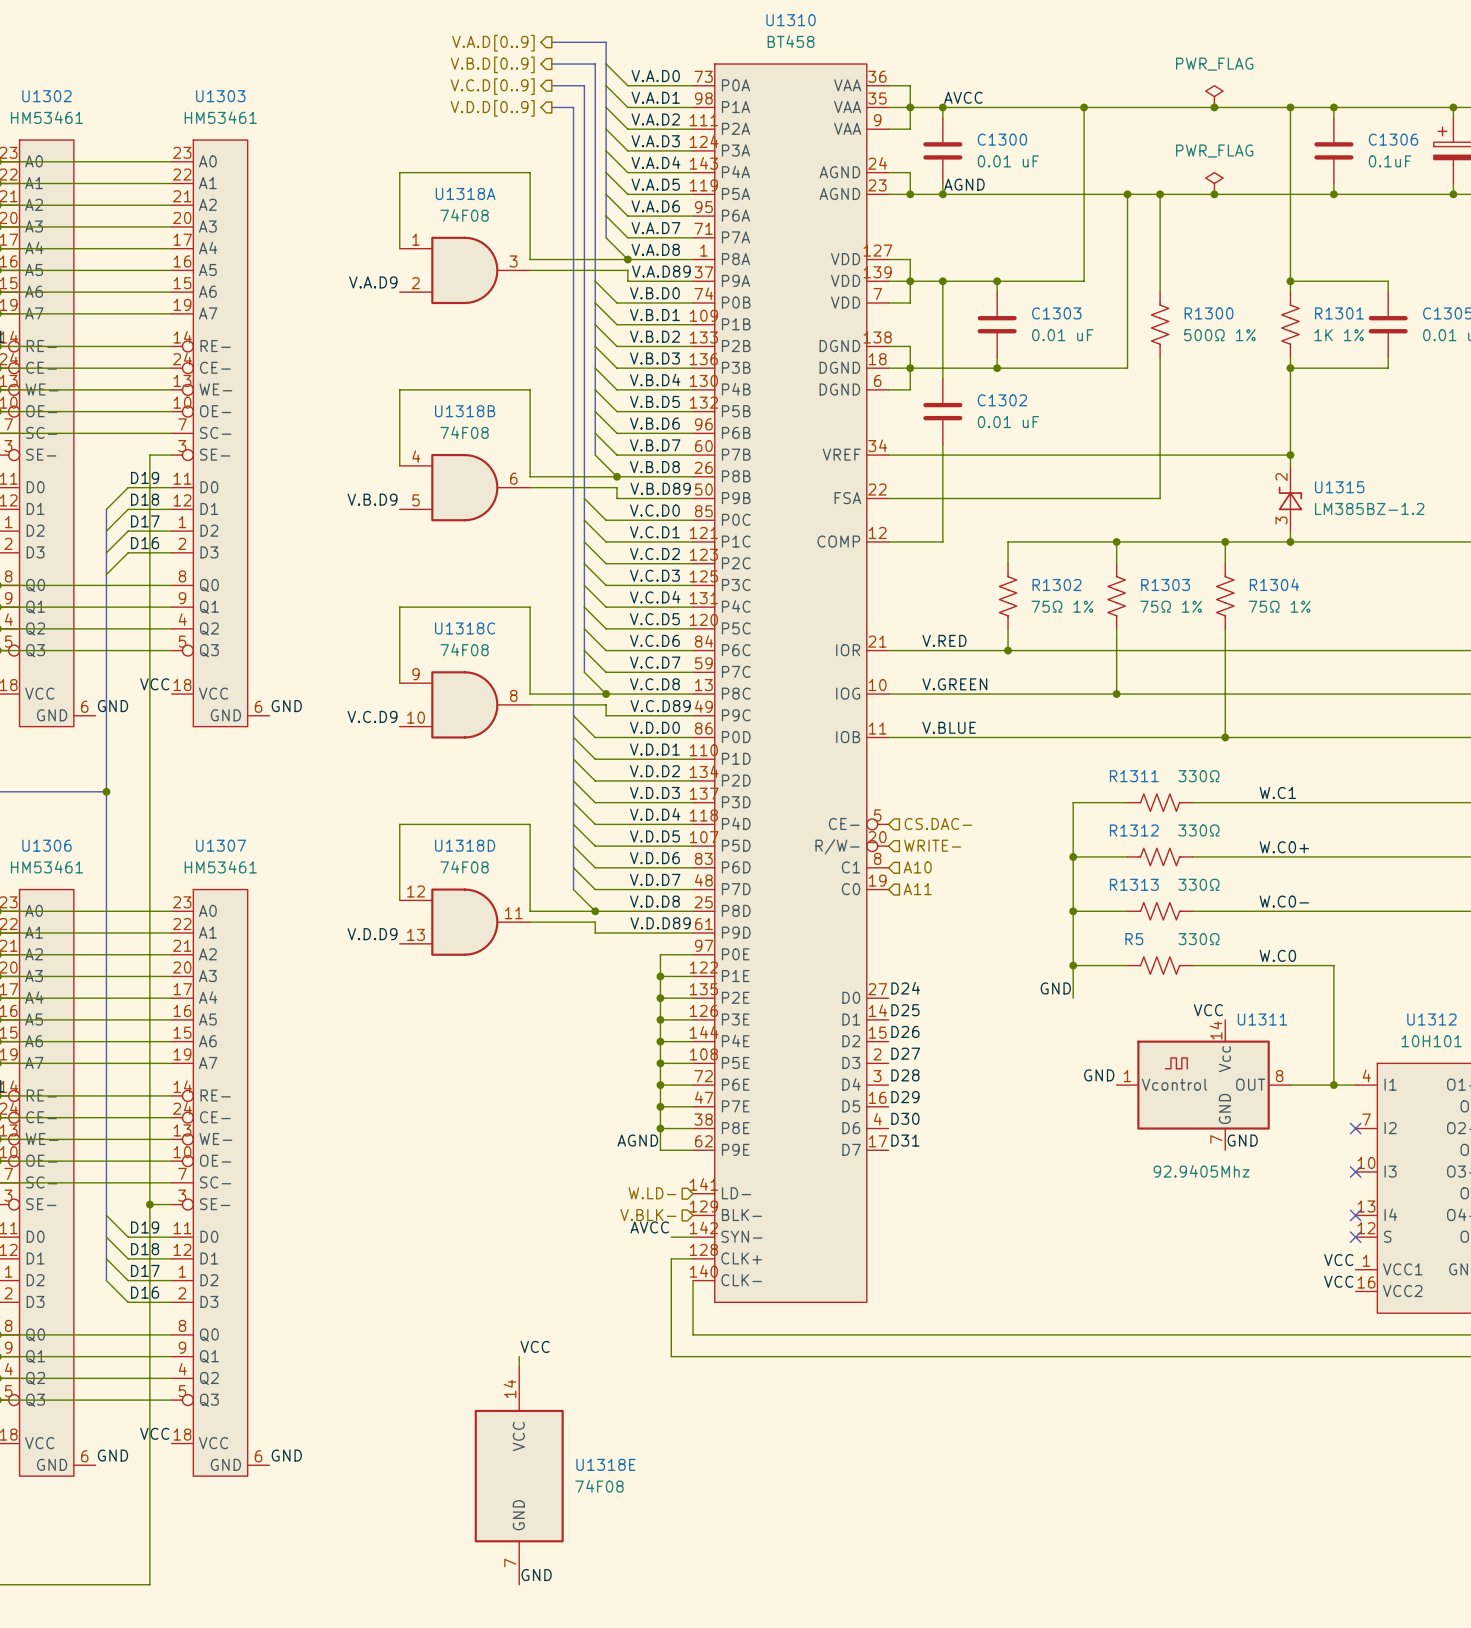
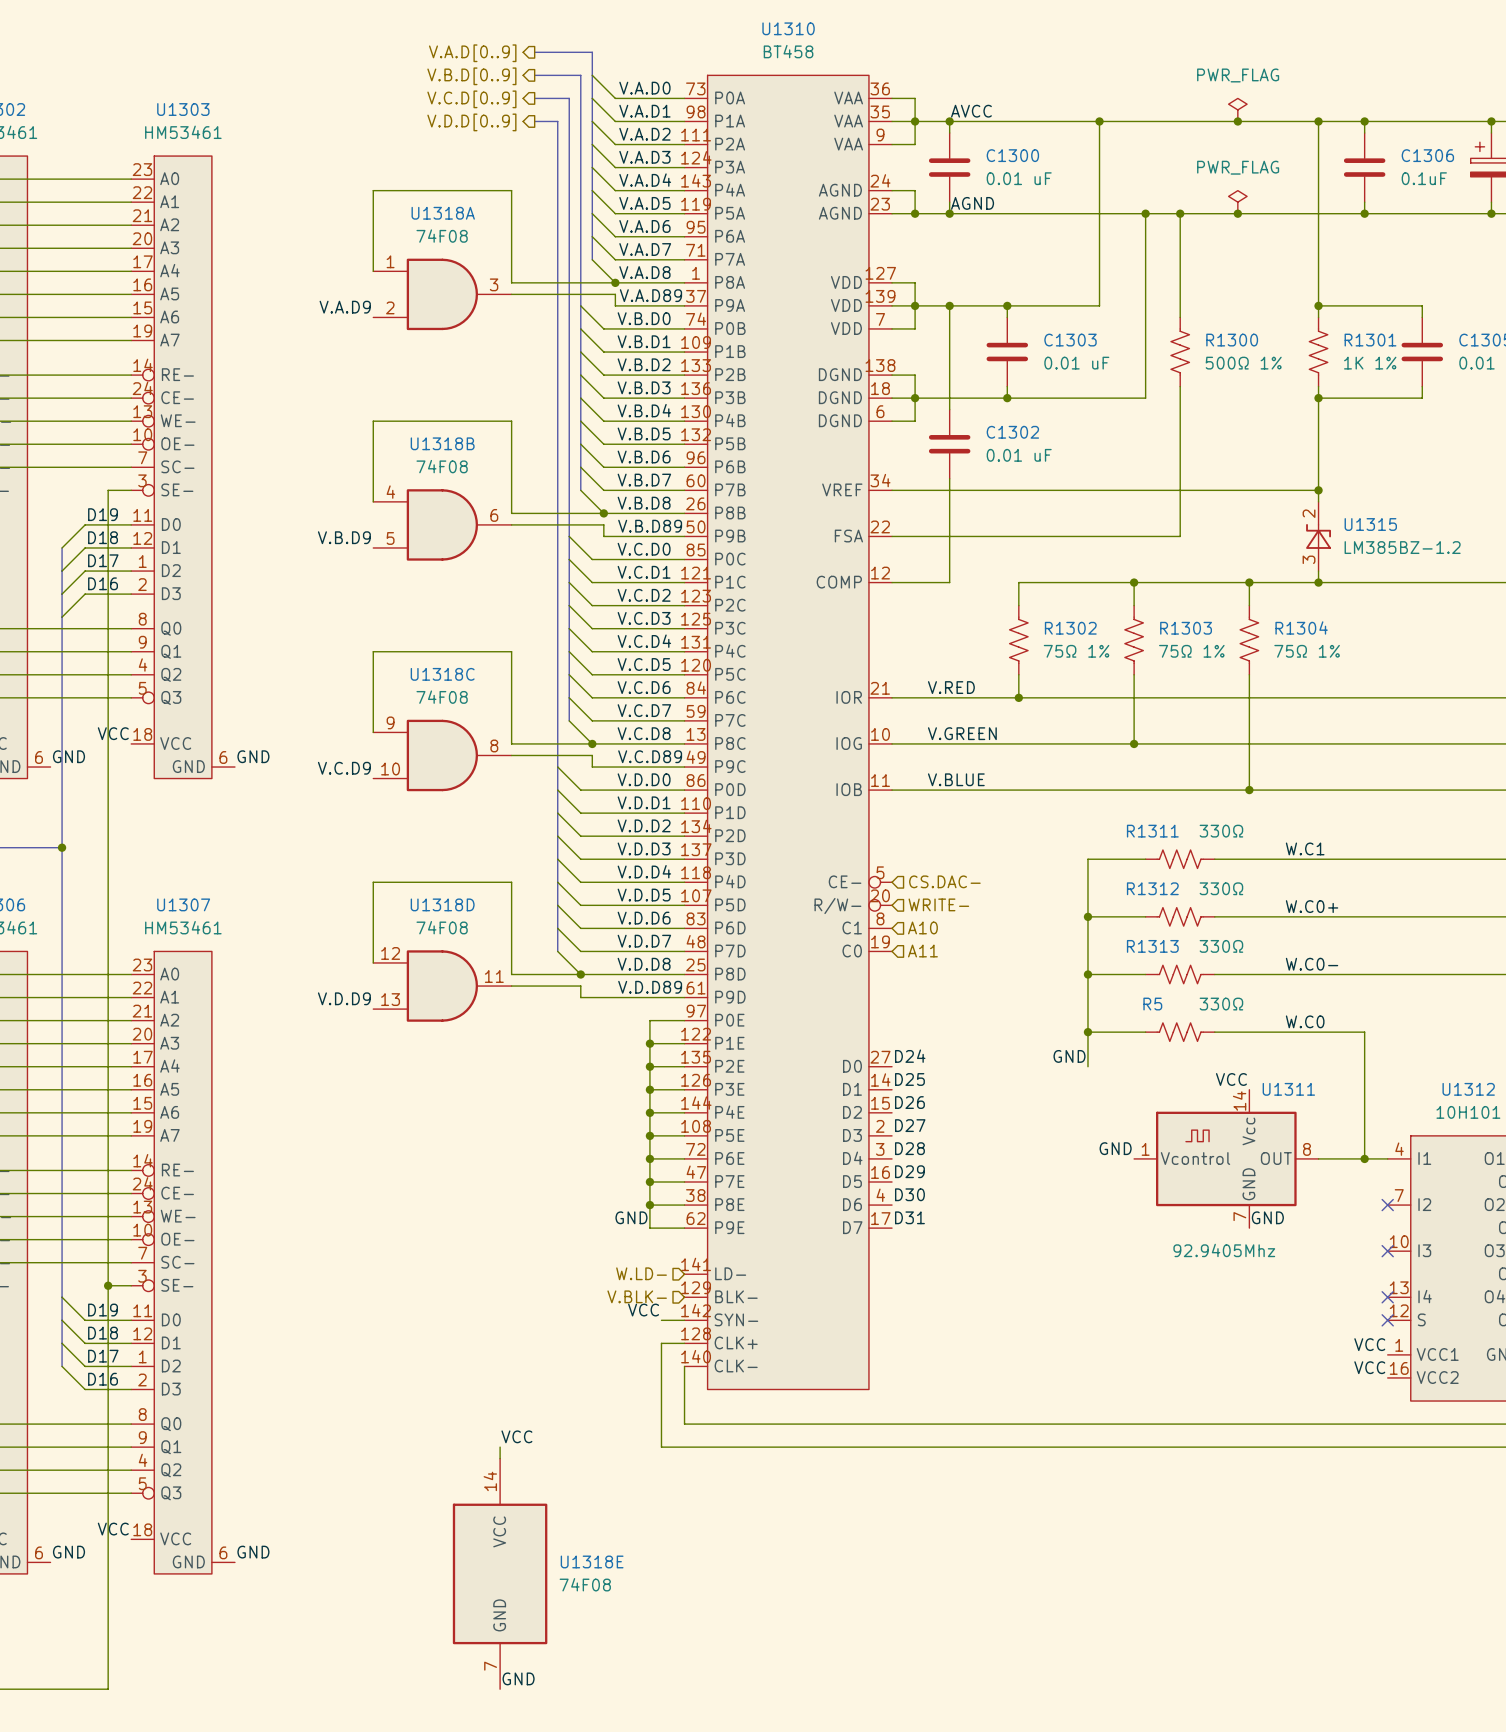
label: AGND (637, 1140) -> GND (631, 1217)
label: AVCC (649, 1227) -> VCC (643, 1310)

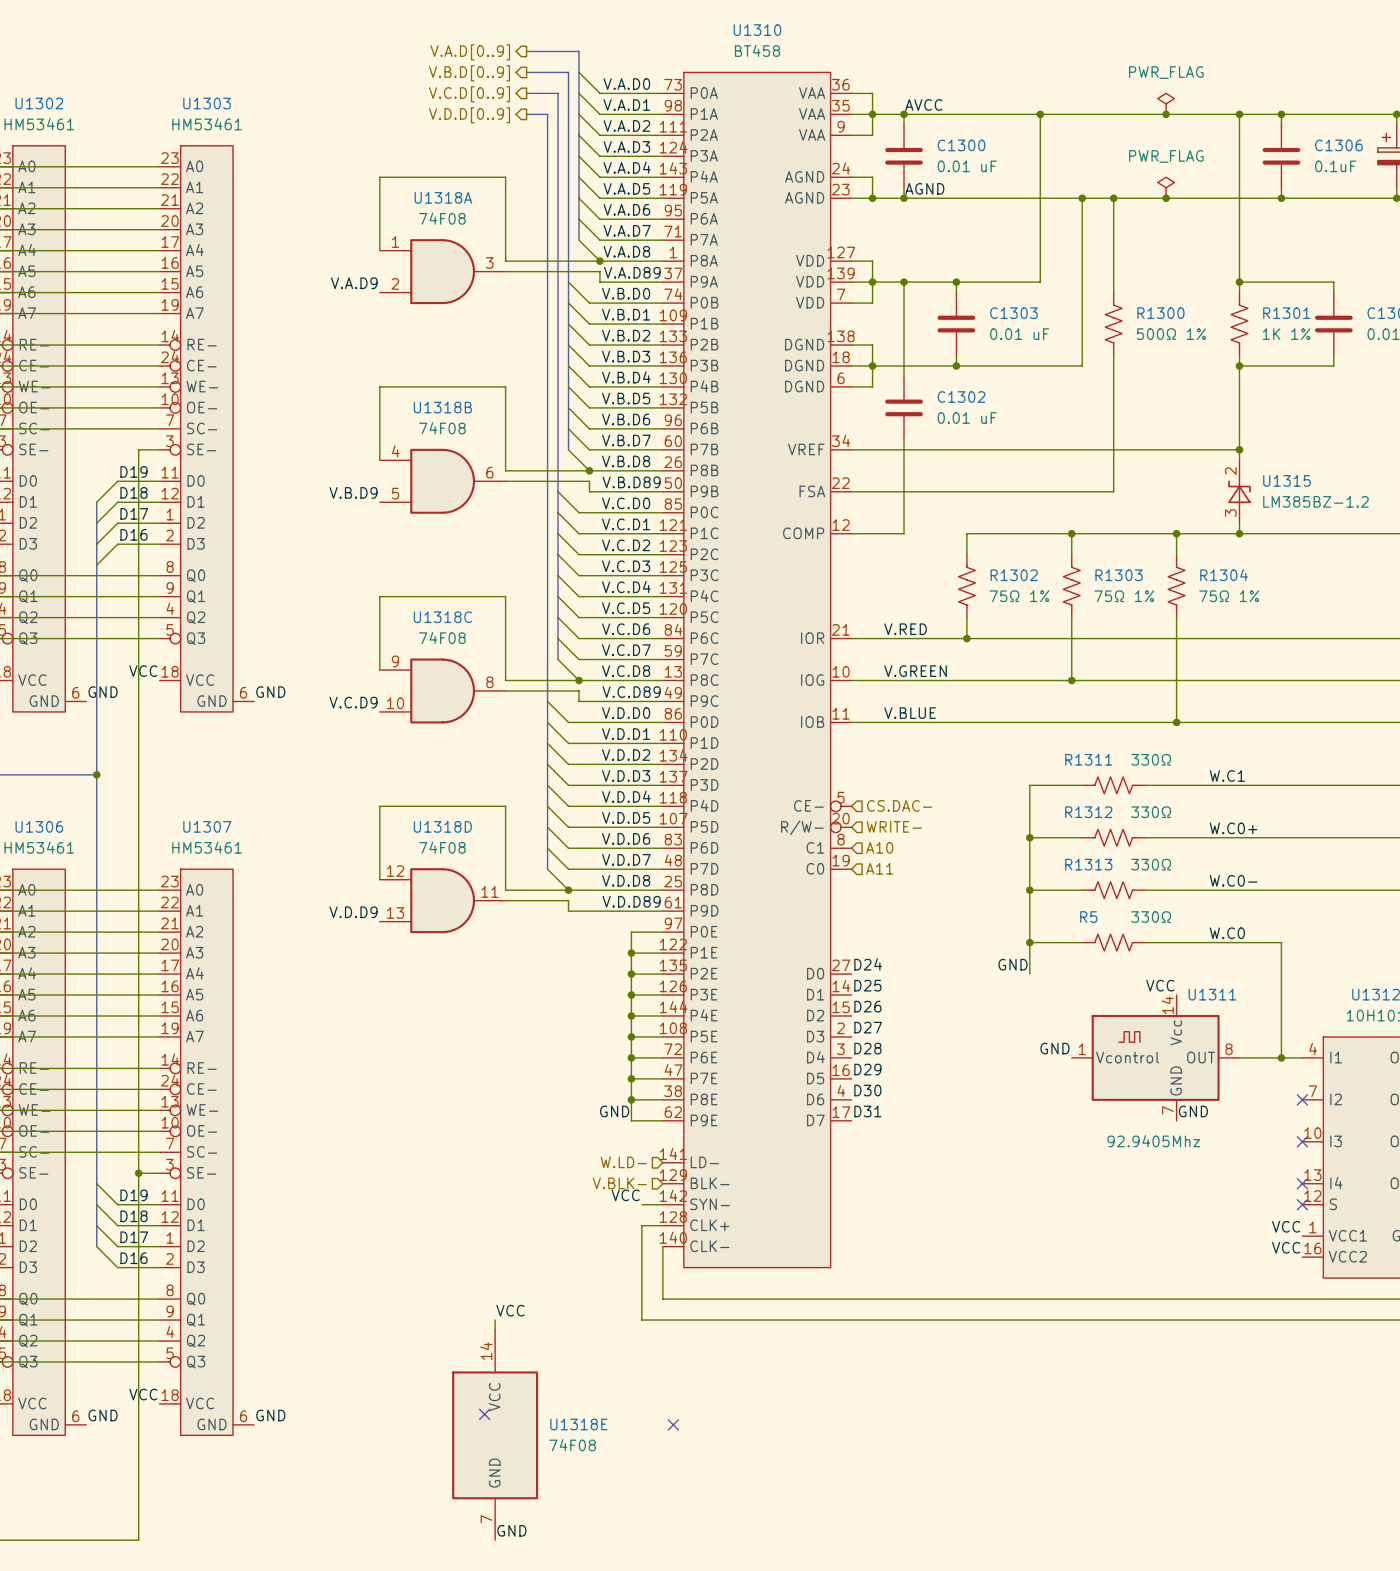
no-connect mark: none -> (484, 1414)
no-connect mark: none -> (673, 1424)

